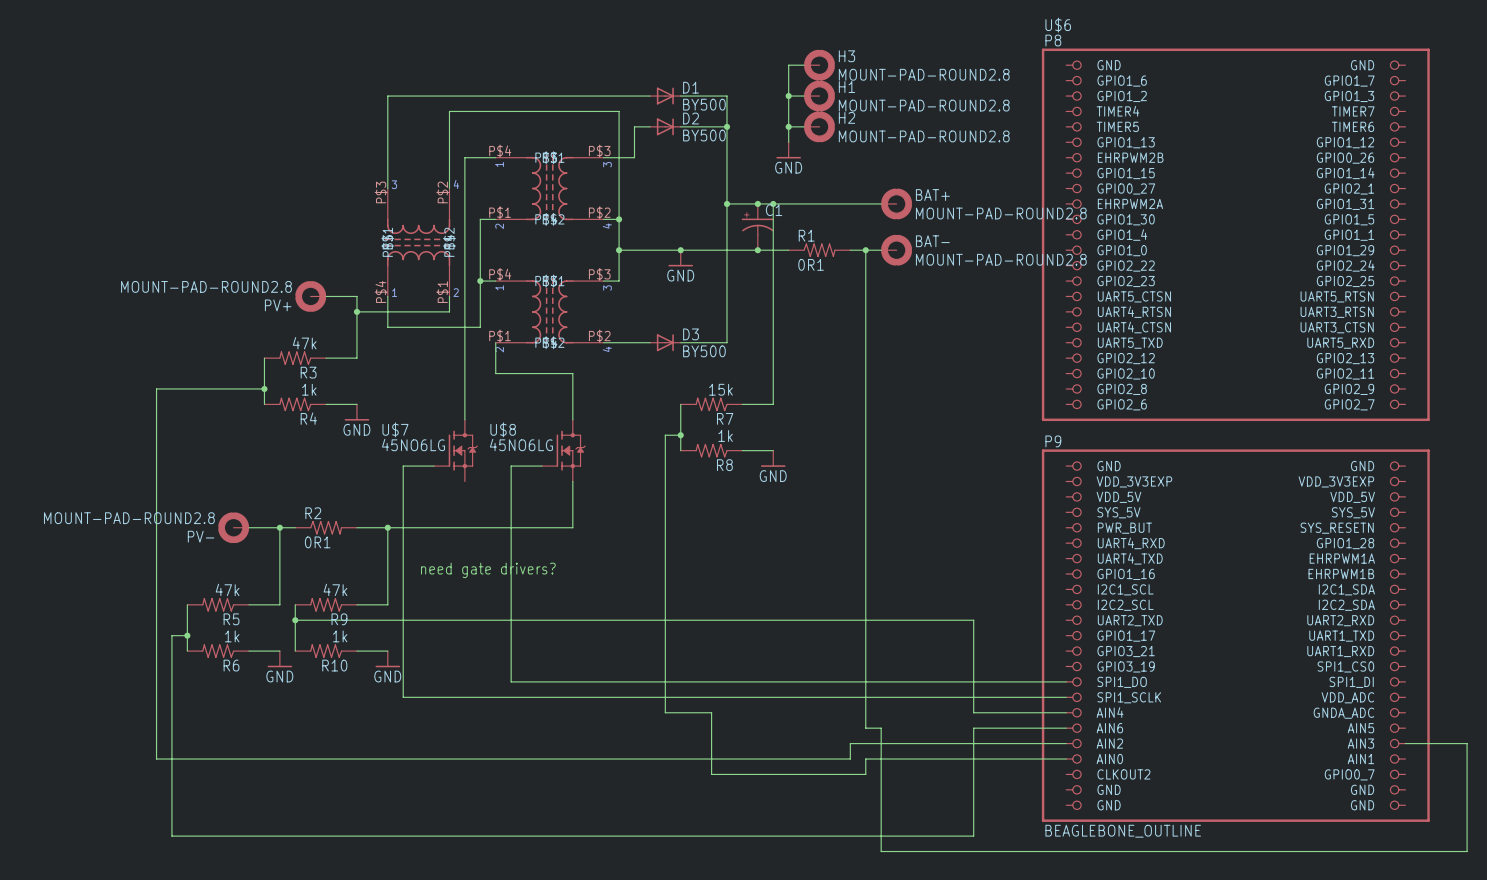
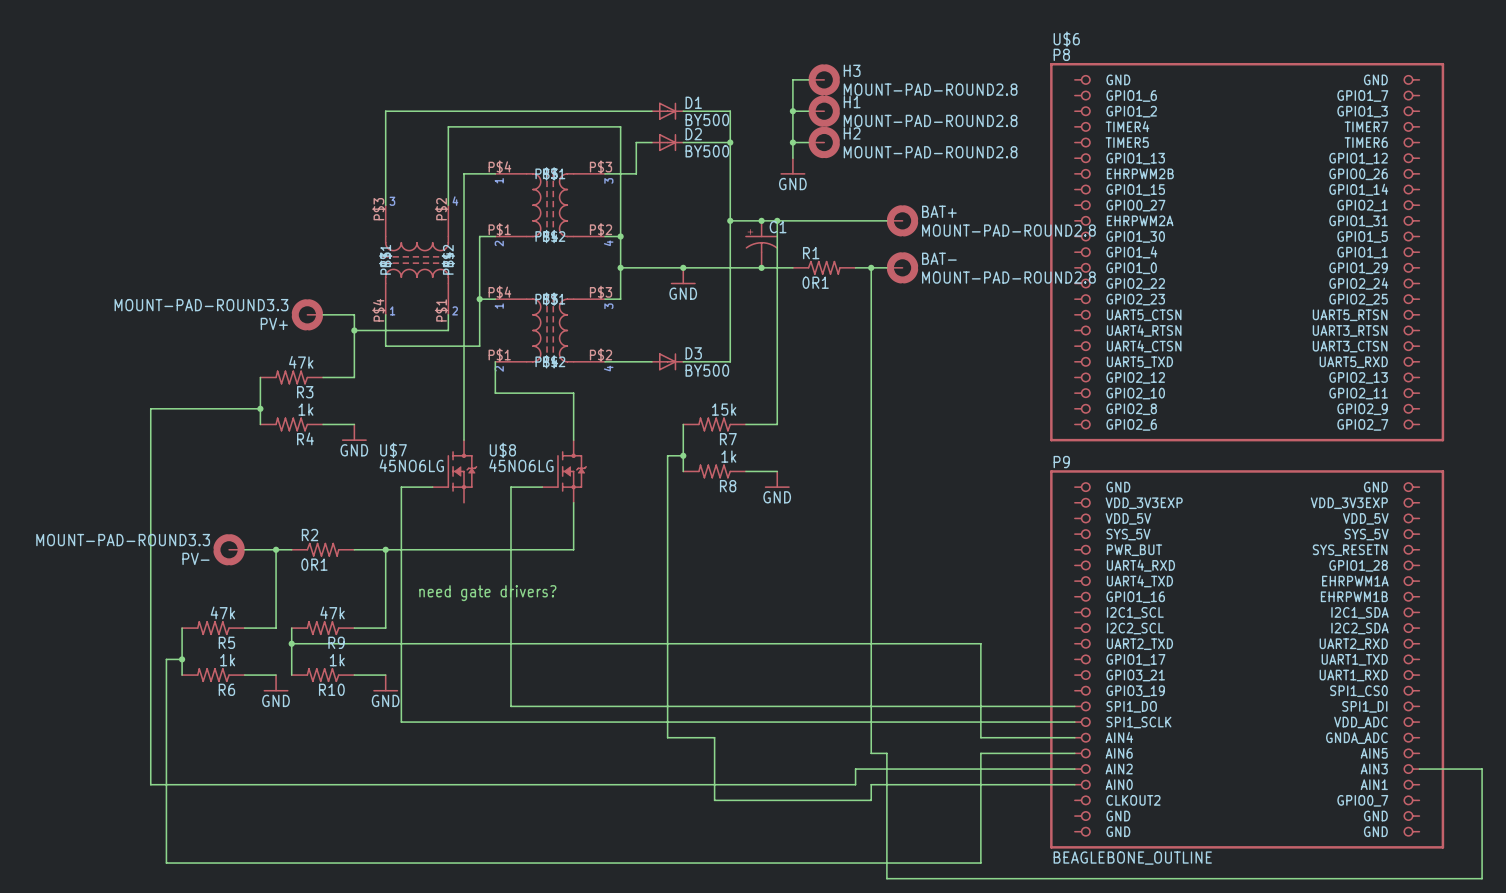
PV+ value: MOUNT-PAD-ROUND2.8 (206, 286) -> MOUNT-PAD-ROUND3.3 (201, 305)
PV- value: MOUNT-PAD-ROUND2.8 (129, 518) -> MOUNT-PAD-ROUND3.3 (123, 540)

